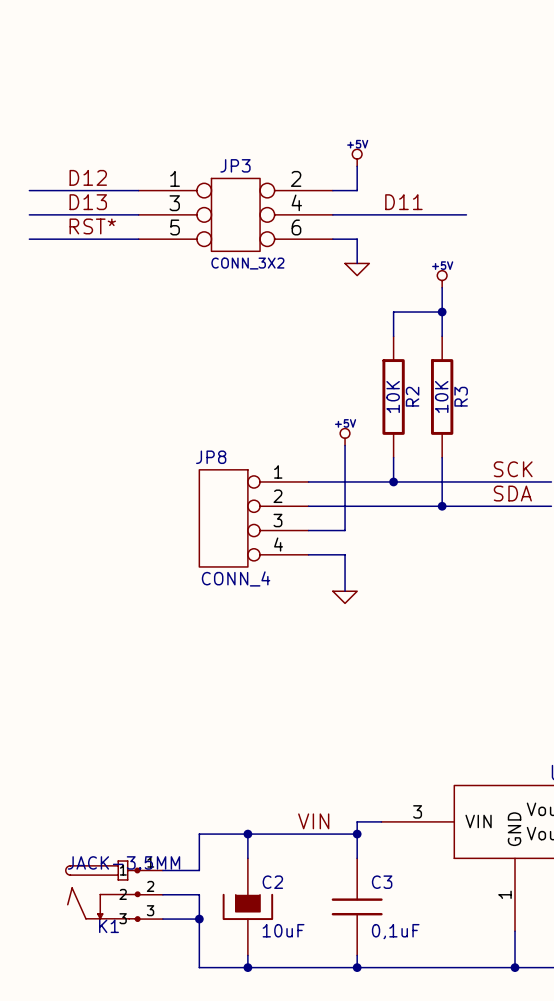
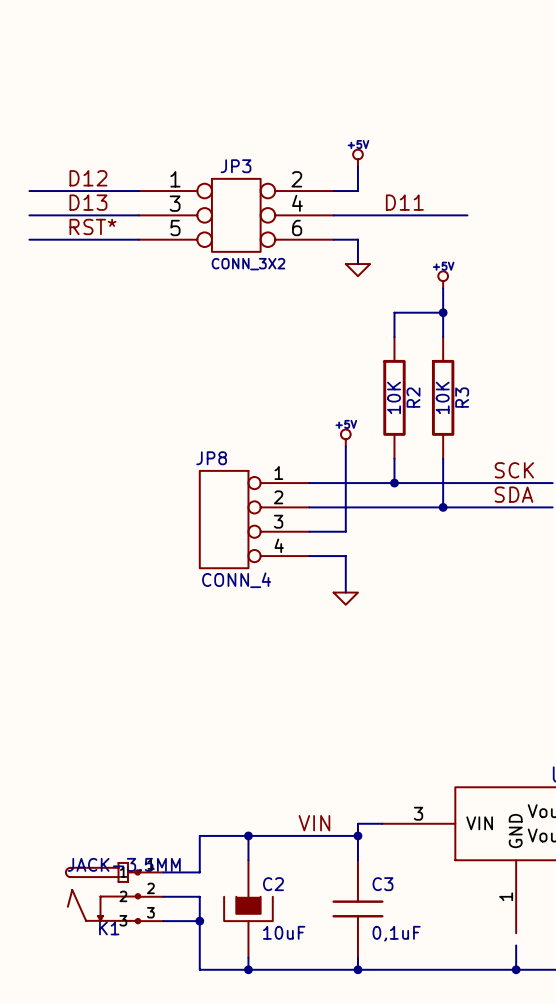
wire: (515, 931) (515, 943) -> none

